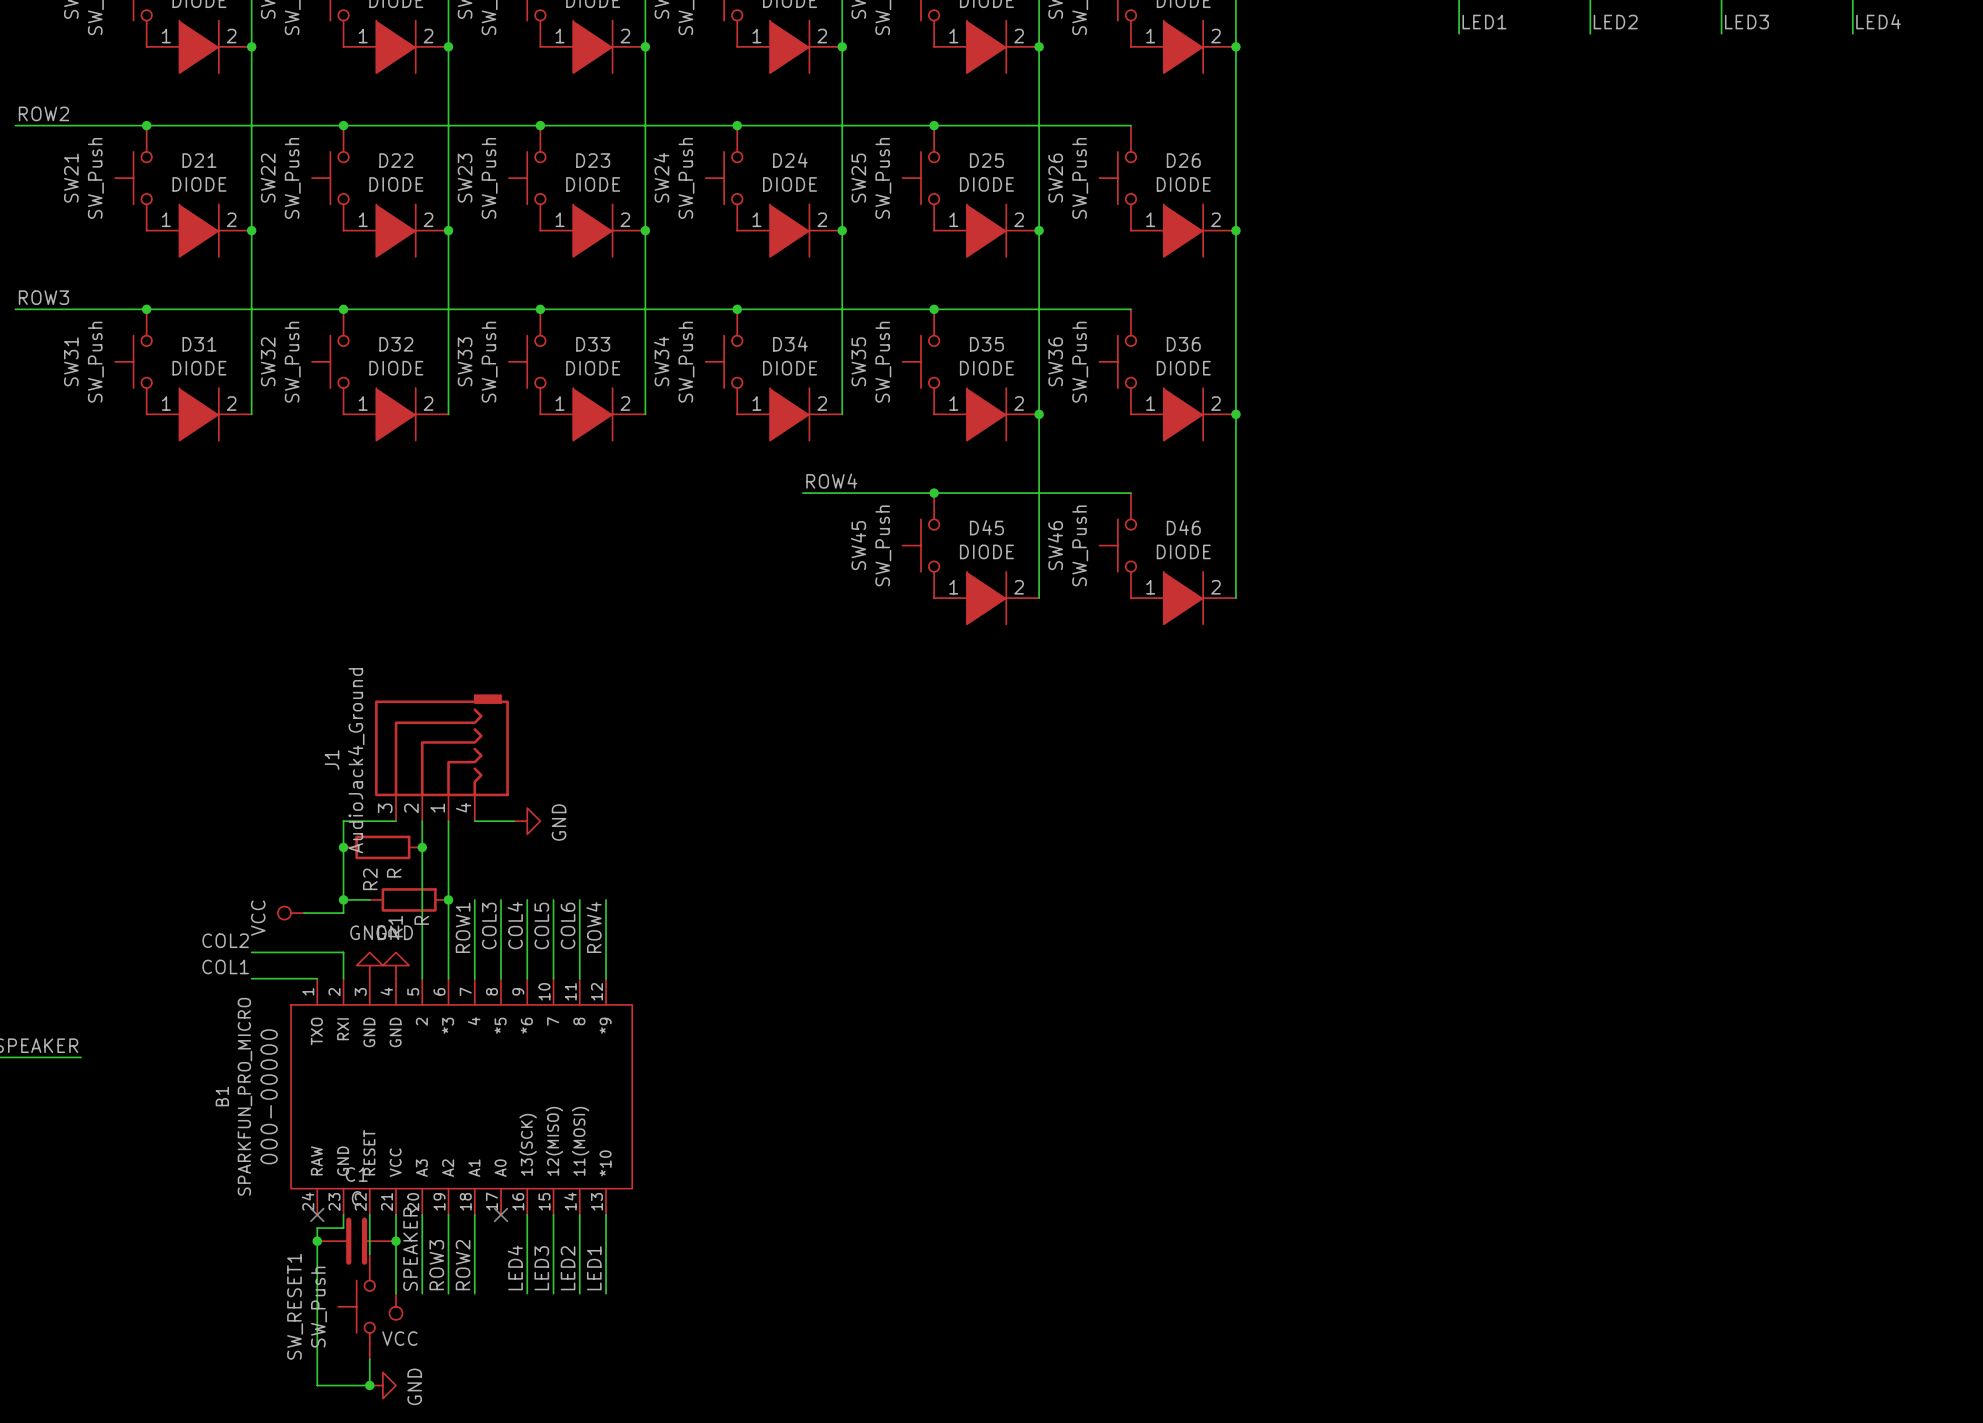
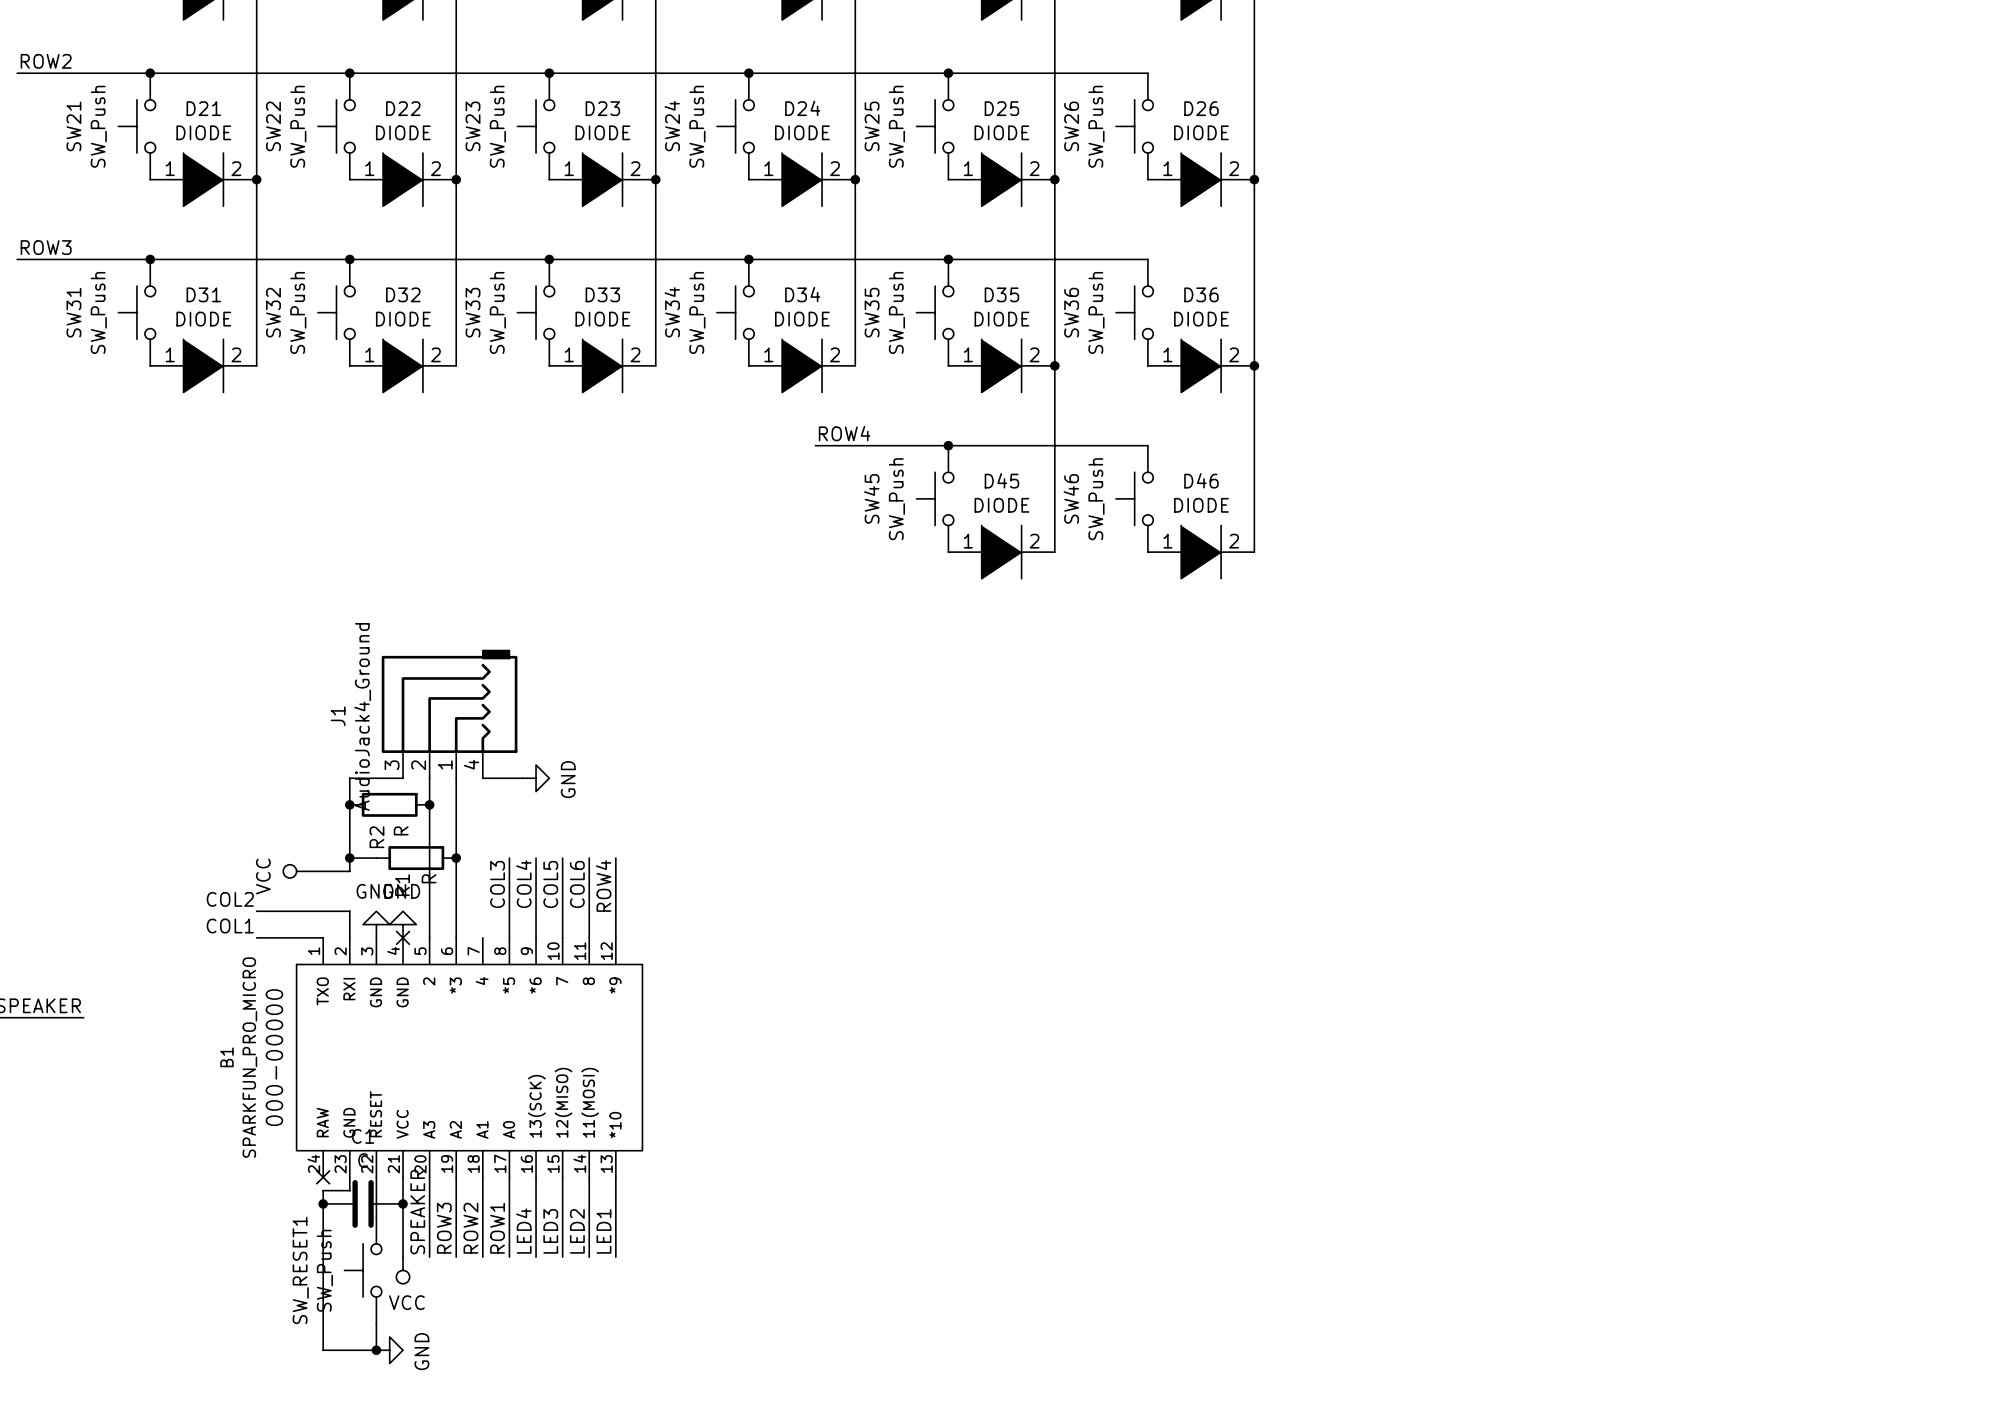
wire: (474, 899) (474, 978) -> none
label: ROW1 (463, 927) -> none
no-connect mark: none -> (403, 937)
wire: none -> (509, 1177) (509, 1257)
no-connect mark: (501, 1214) -> none
label: none -> ROW1 (497, 1228)

